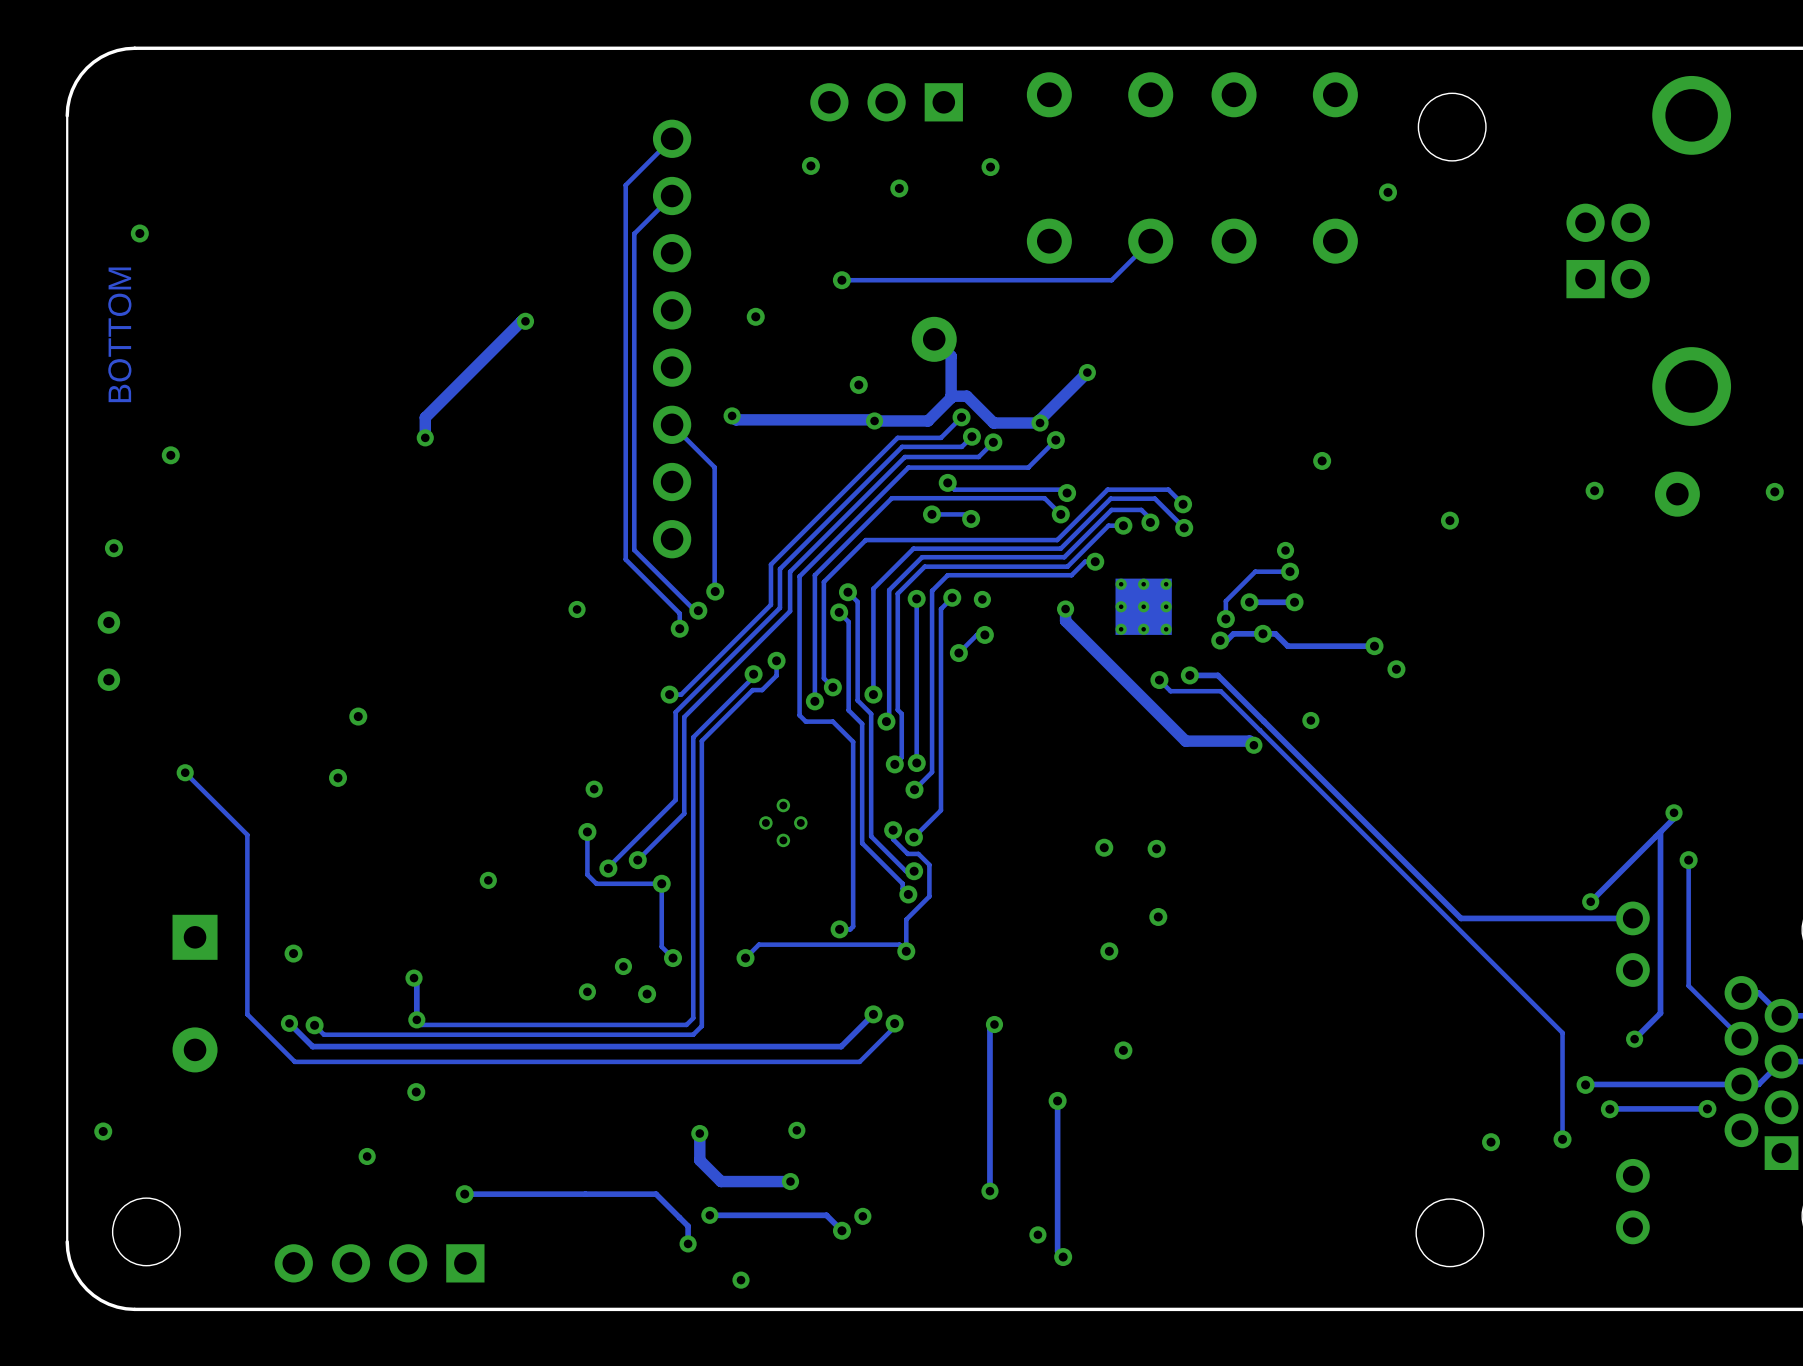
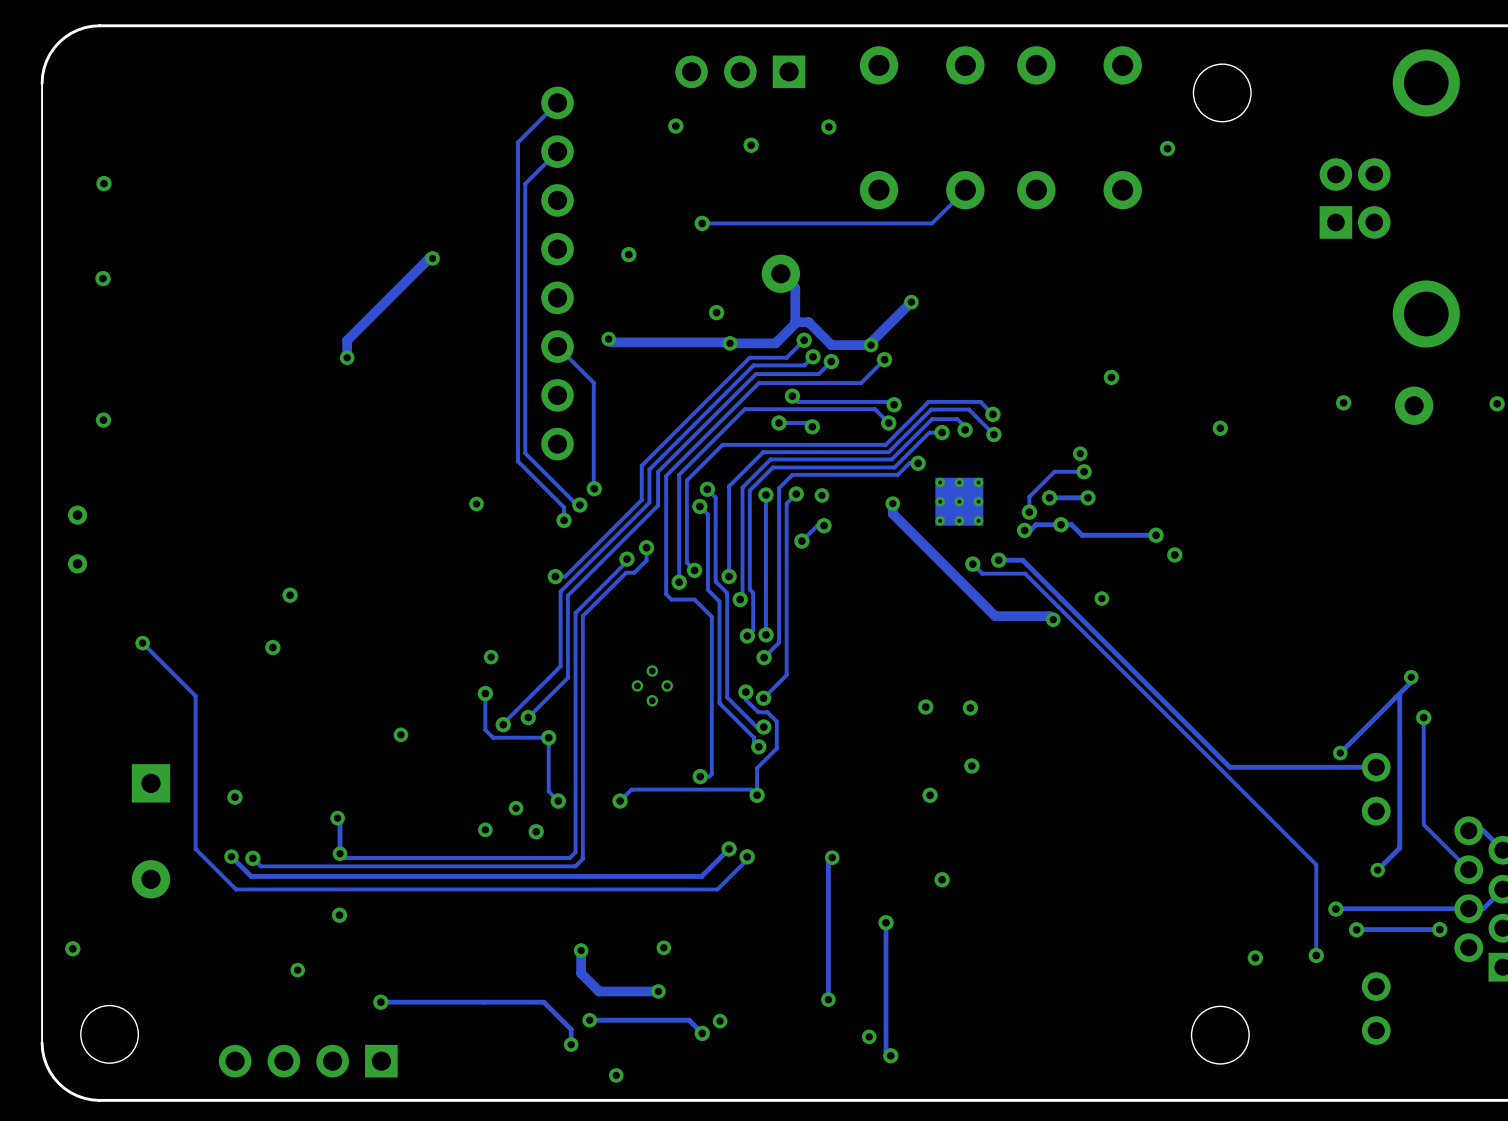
text: BOTTOM (119, 334) -> none
via: none -> (103, 278)
via: (170, 455) -> none
via: none -> (103, 420)
via: (113, 548) -> none

